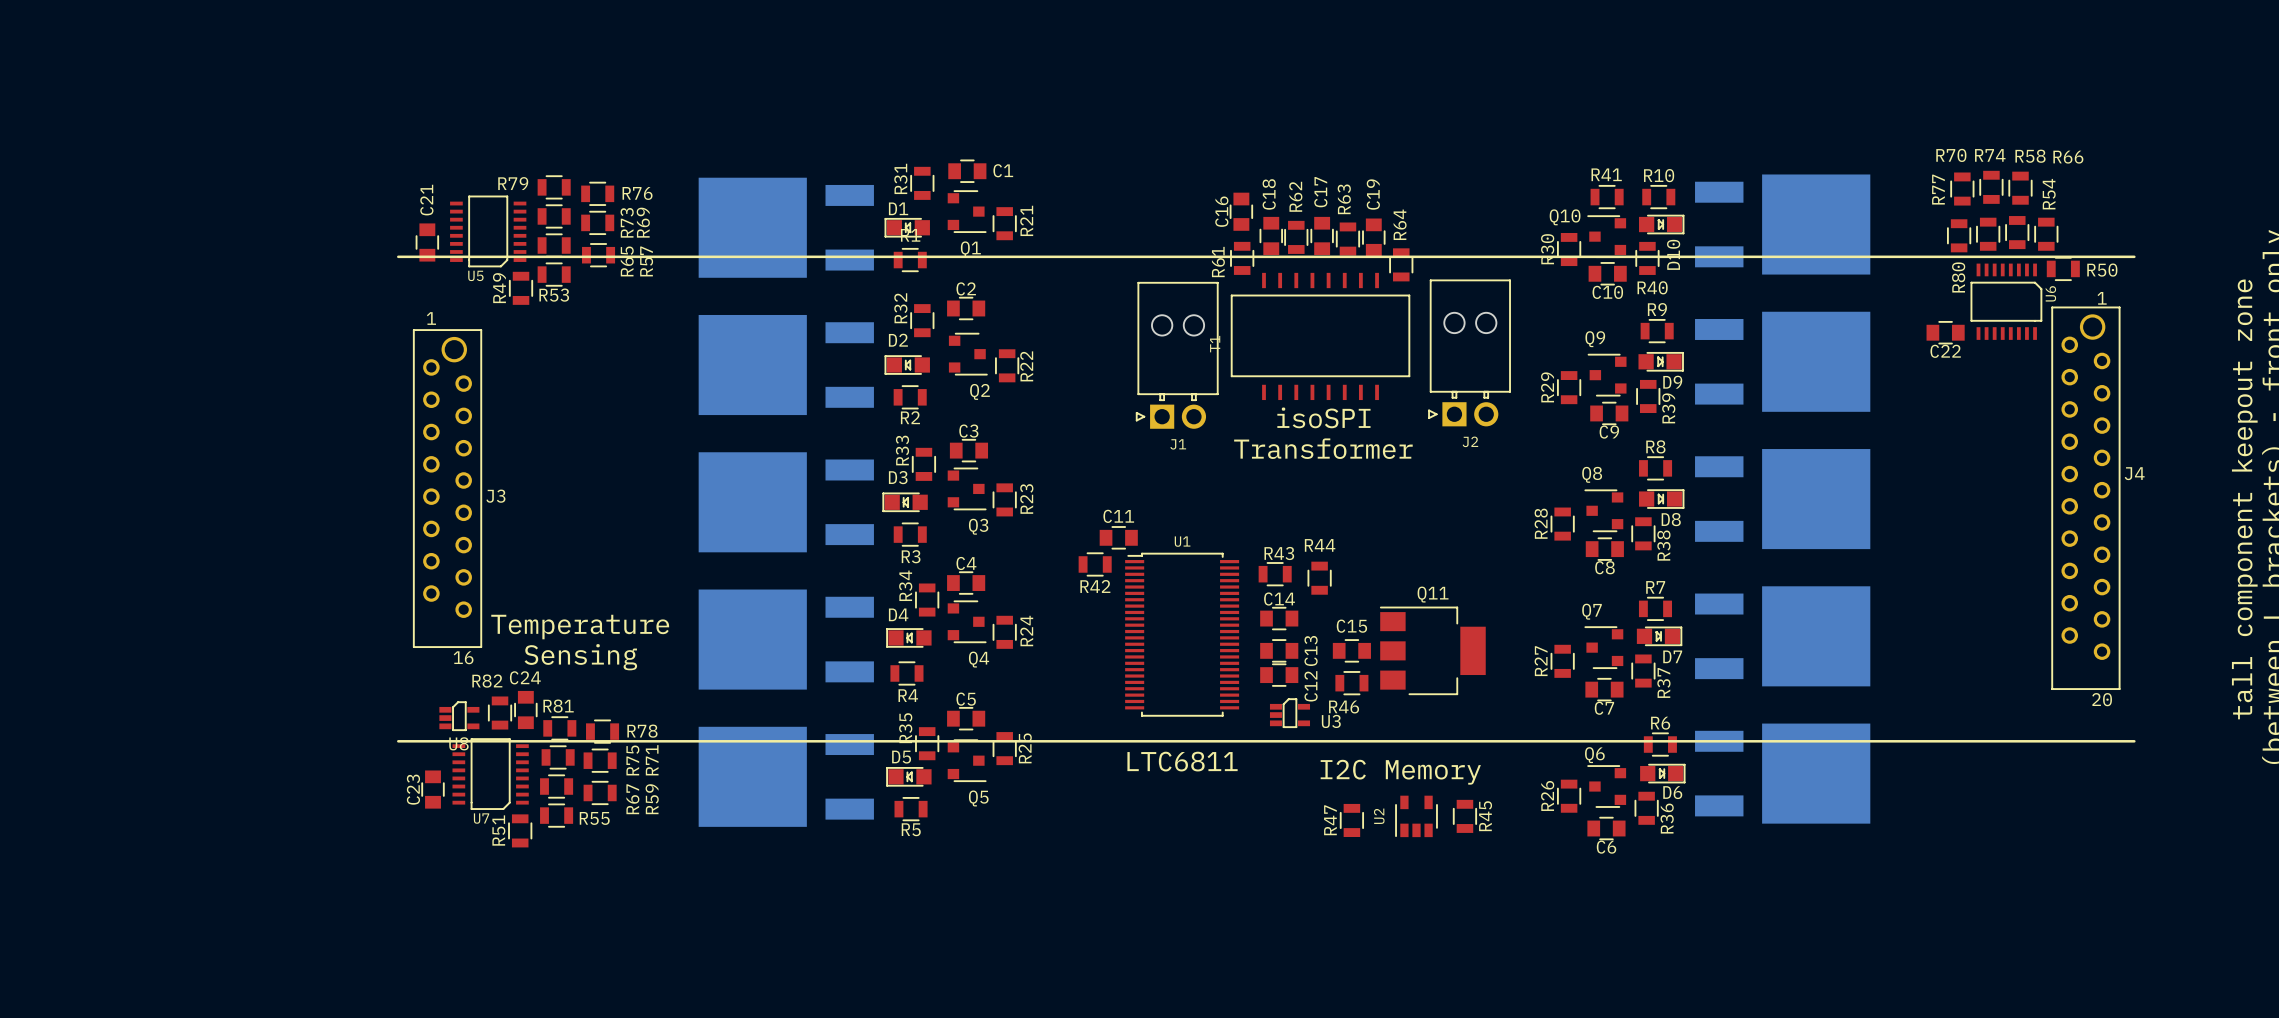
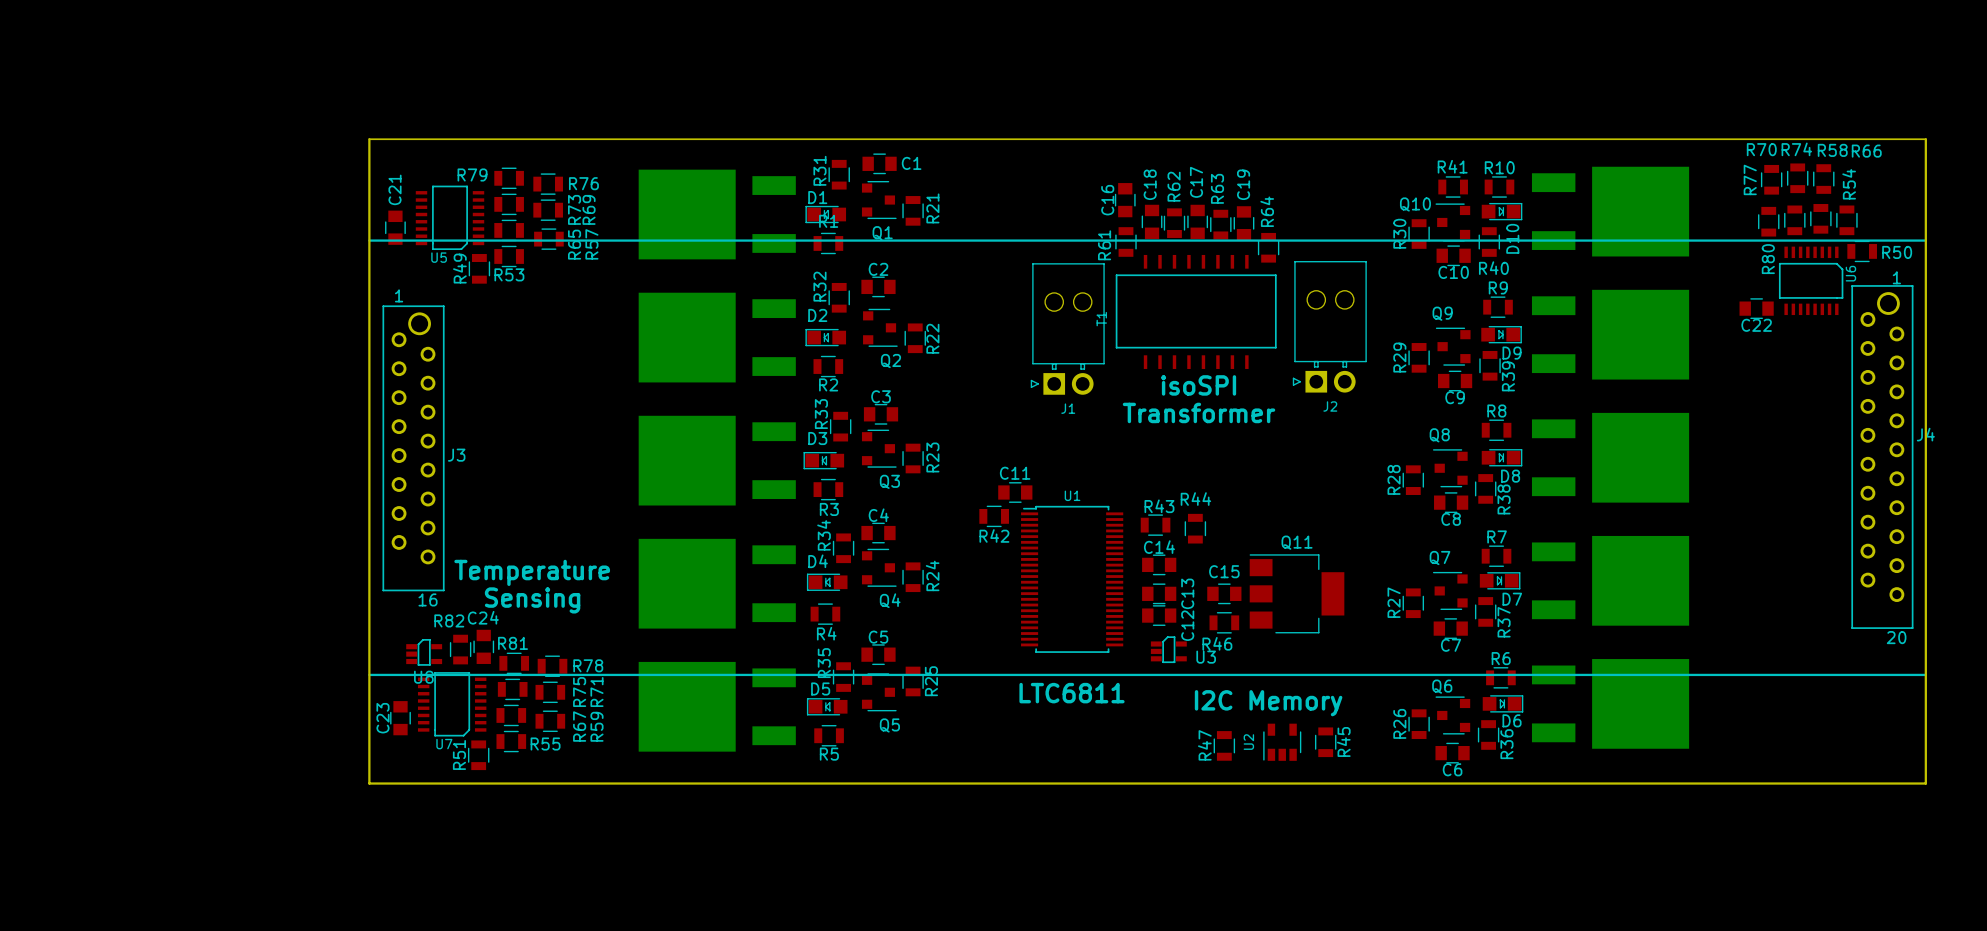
board edge: none -> (369, 139) (1925, 139) (1925, 783) (369, 783) (369, 139)

